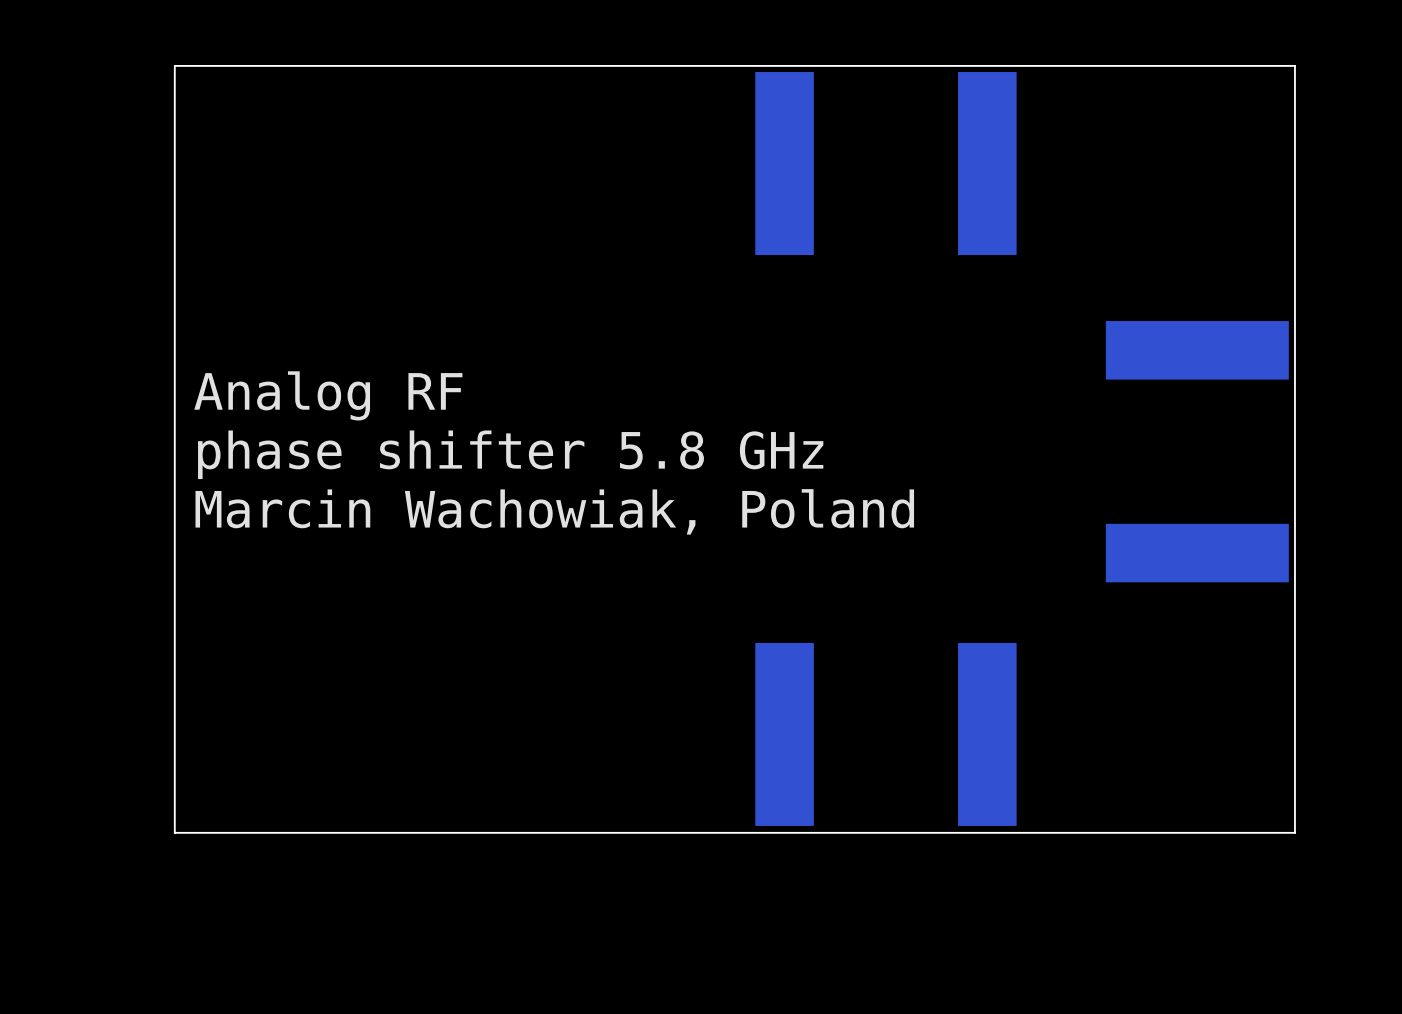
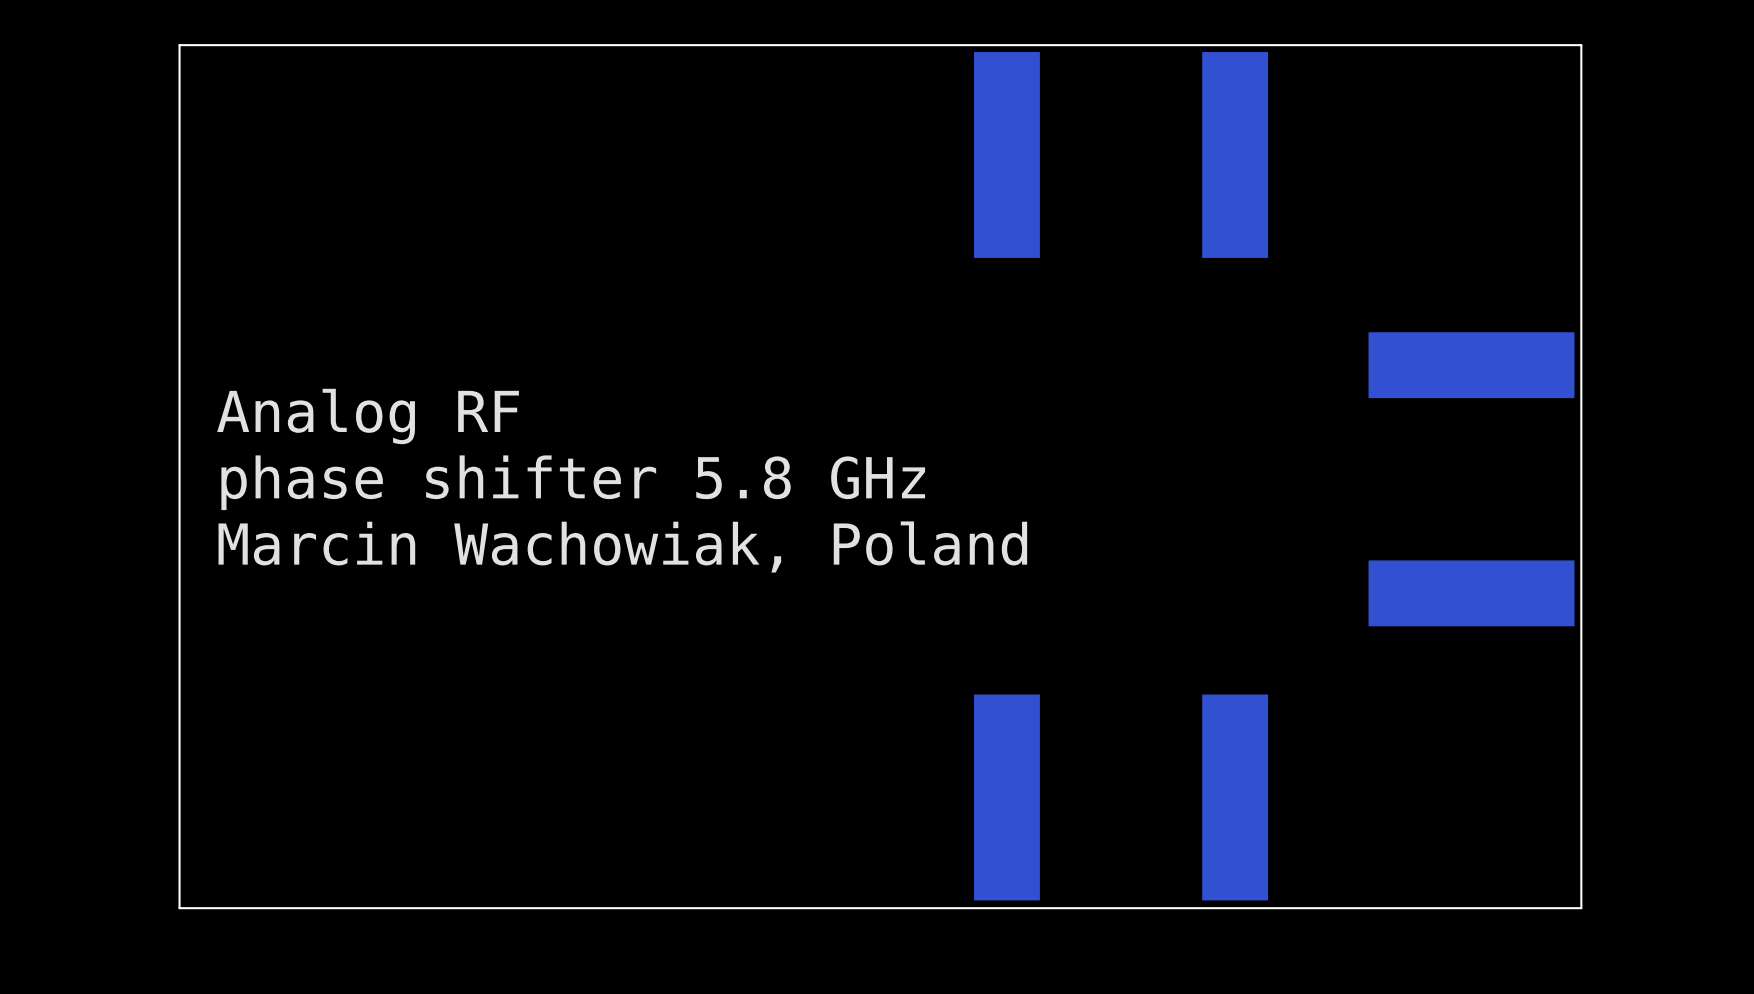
board edge: (174, 65) (174, 832) -> (320, 45) (179, 45) (179, 908) (320, 908)
text position: Analog RF (328, 395) -> Analog RF (368, 416)
text position: phase shifter 5.8 GHz (510, 454) -> phase shifter 5.8 GHz (573, 482)
text position: Marcin Wachowiak, Poland (554, 511) -> Marcin Wachowiak, Poland (622, 546)

